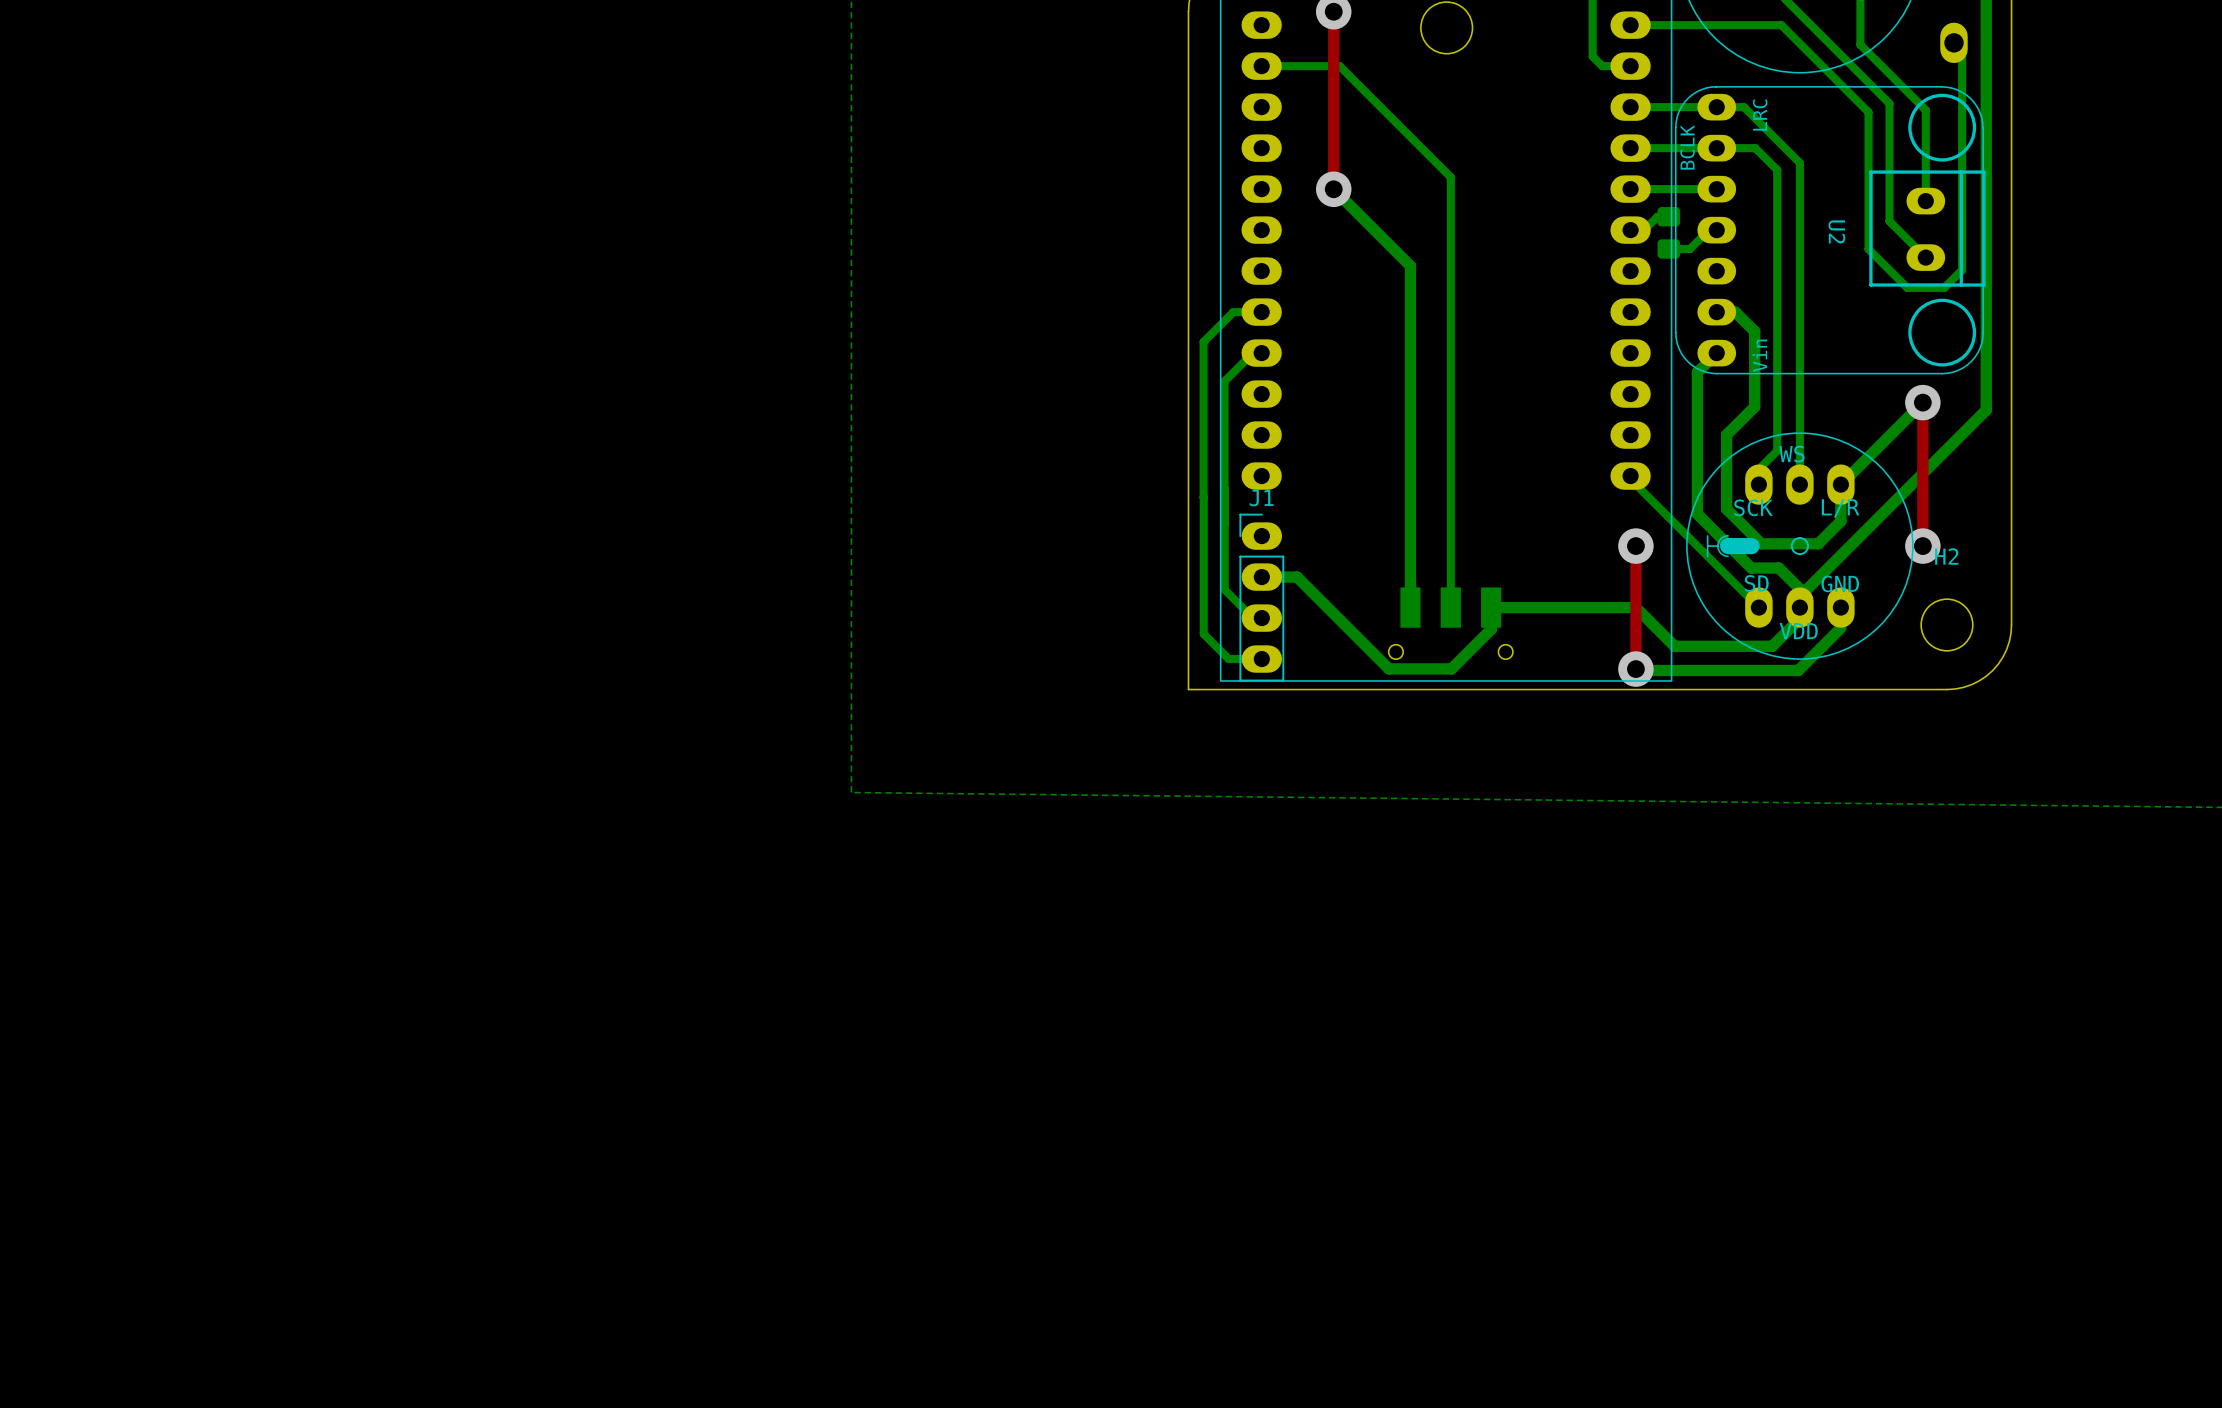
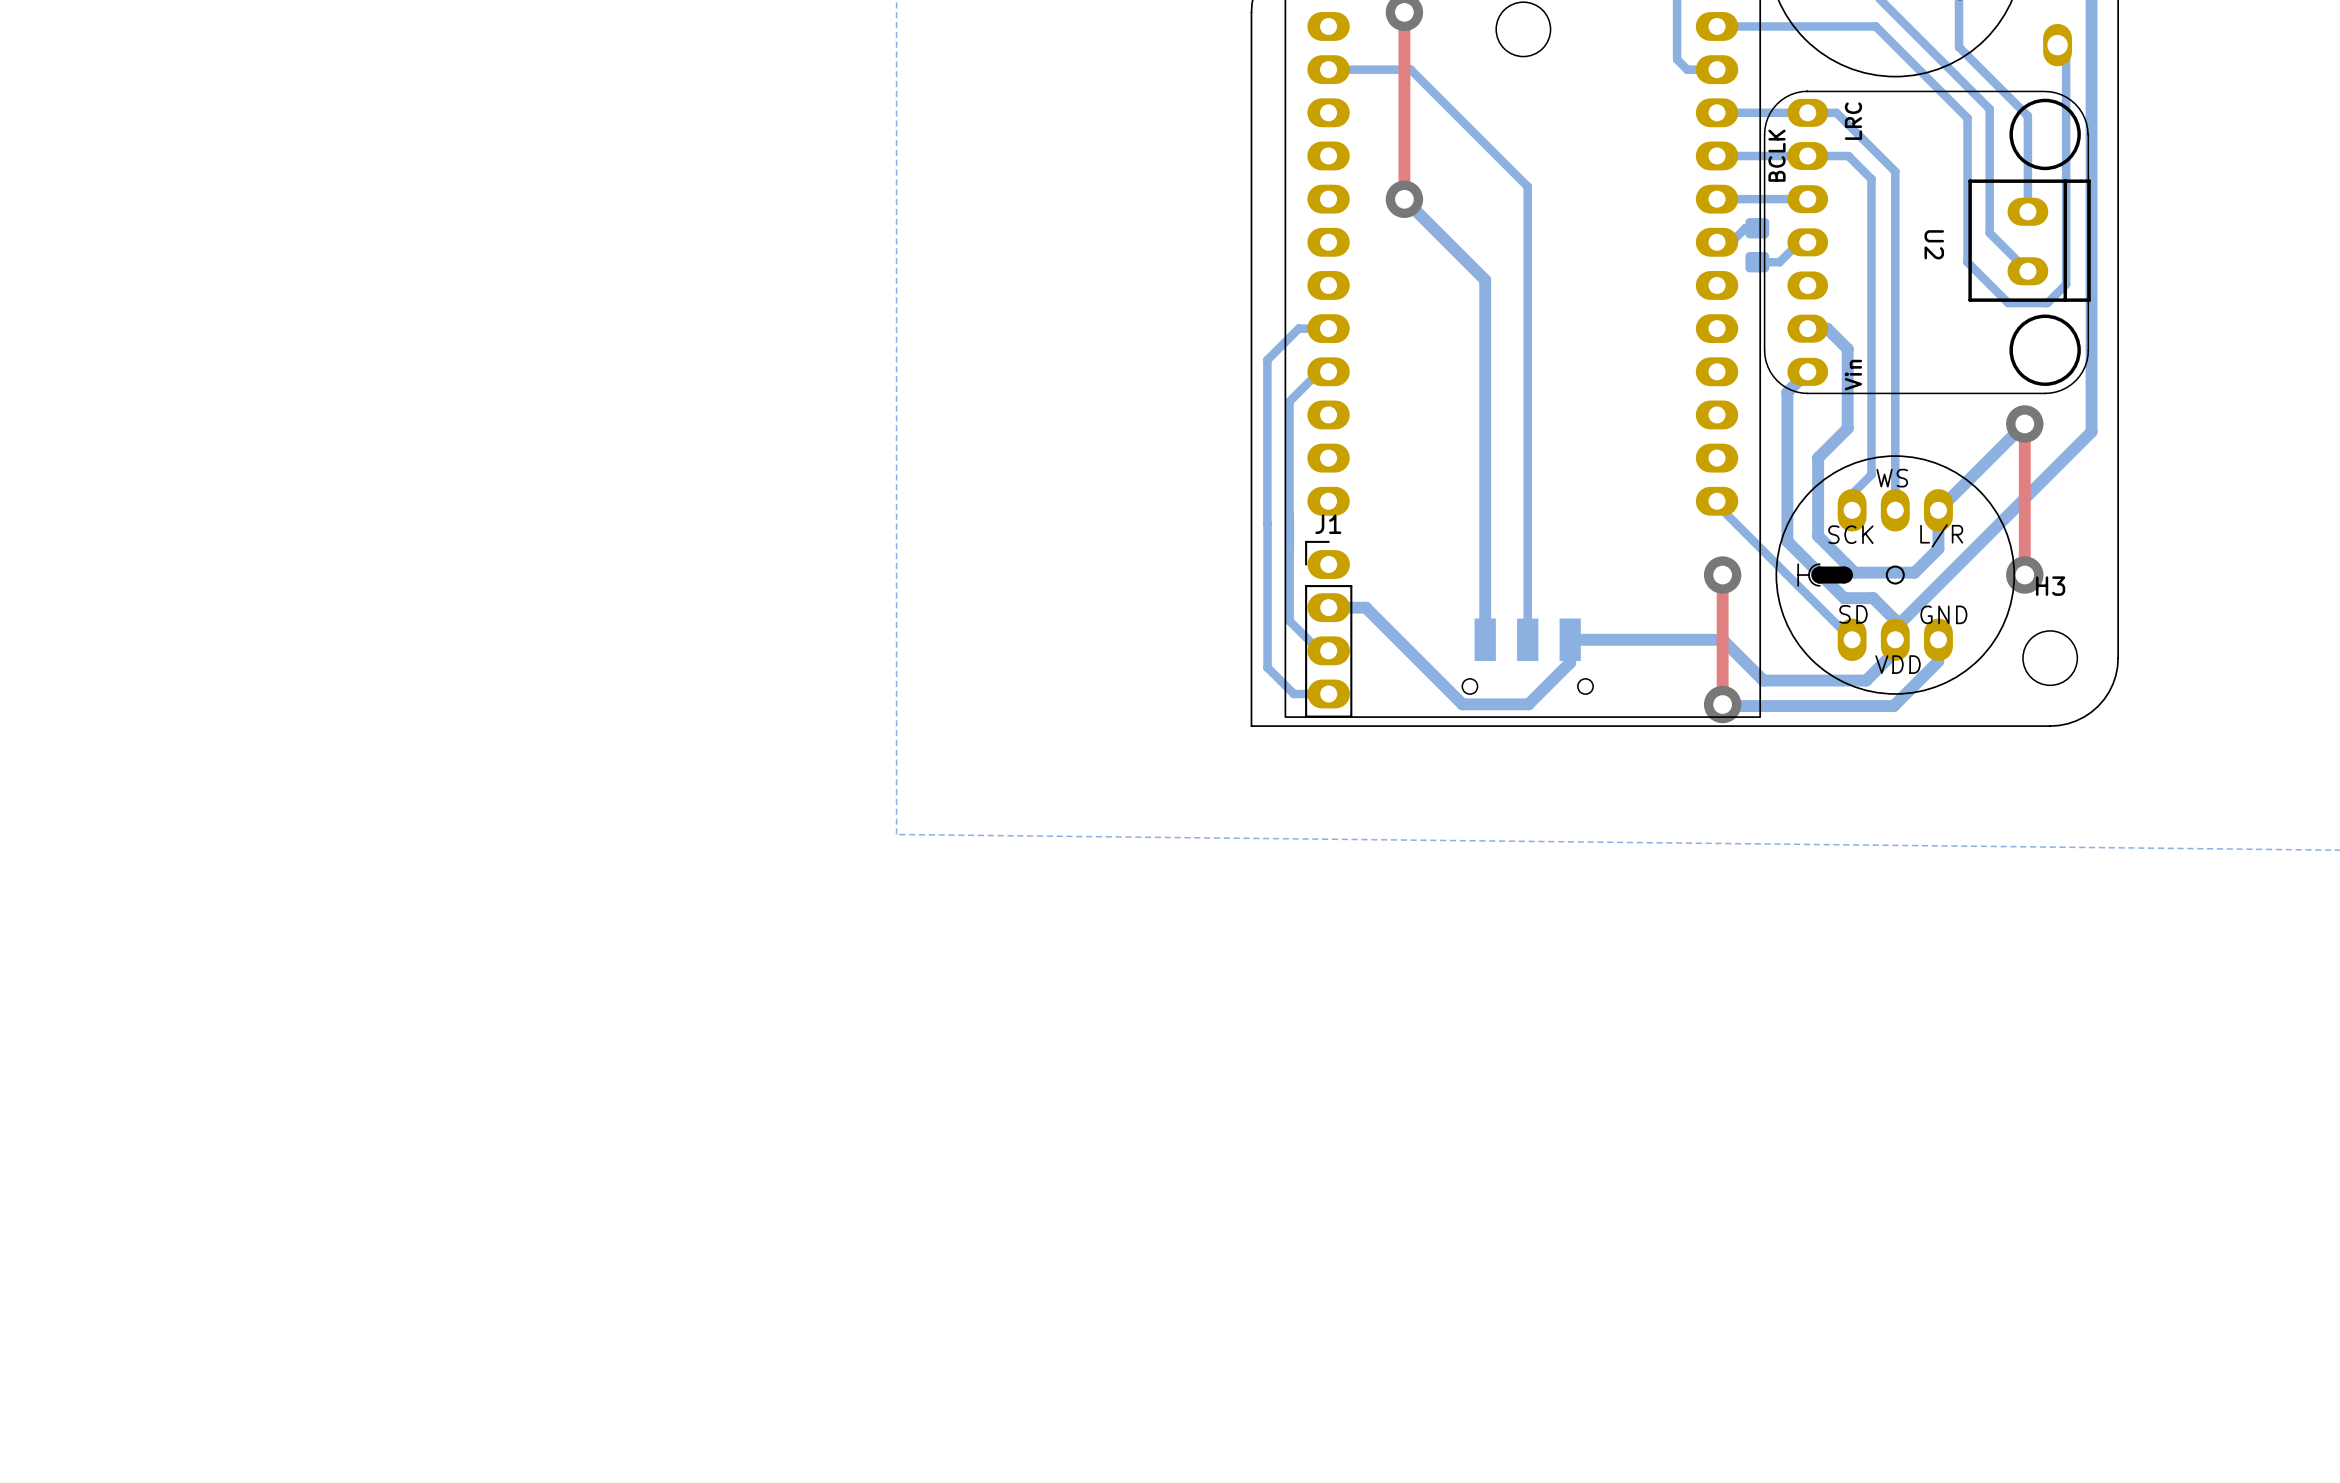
H2 name: H2 (1946, 556) -> H3 (2050, 586)

